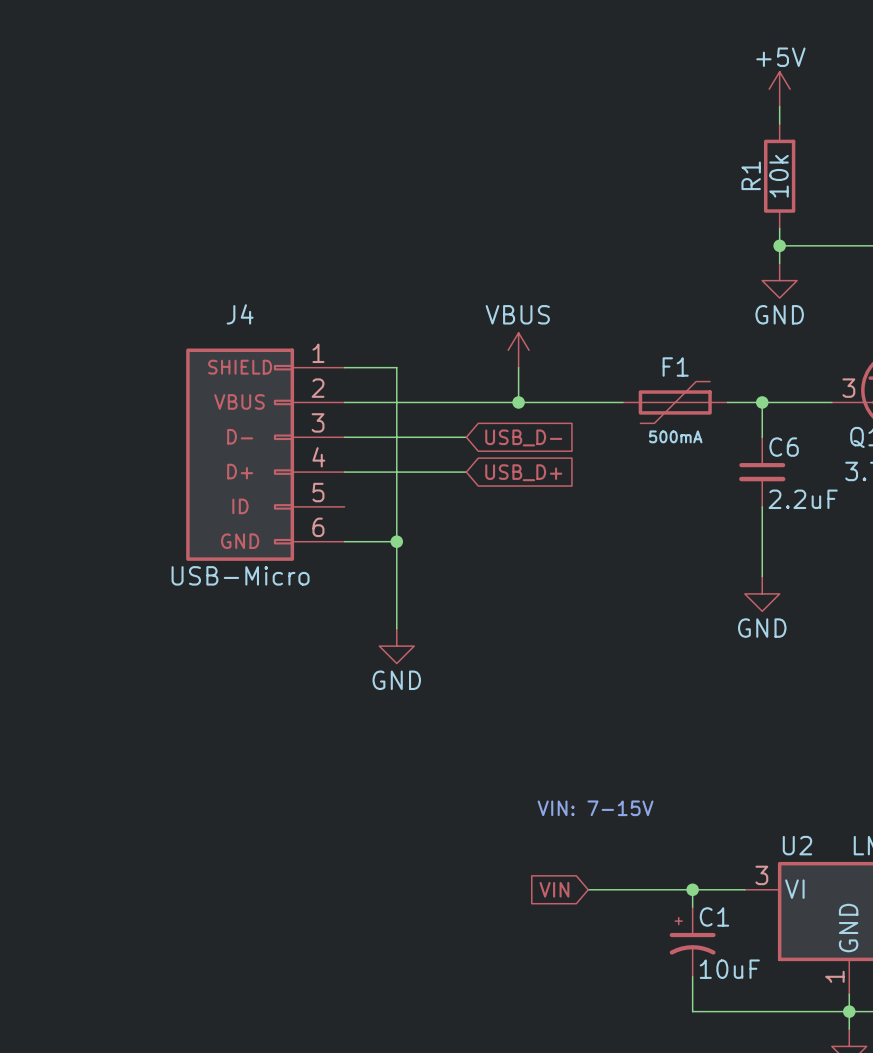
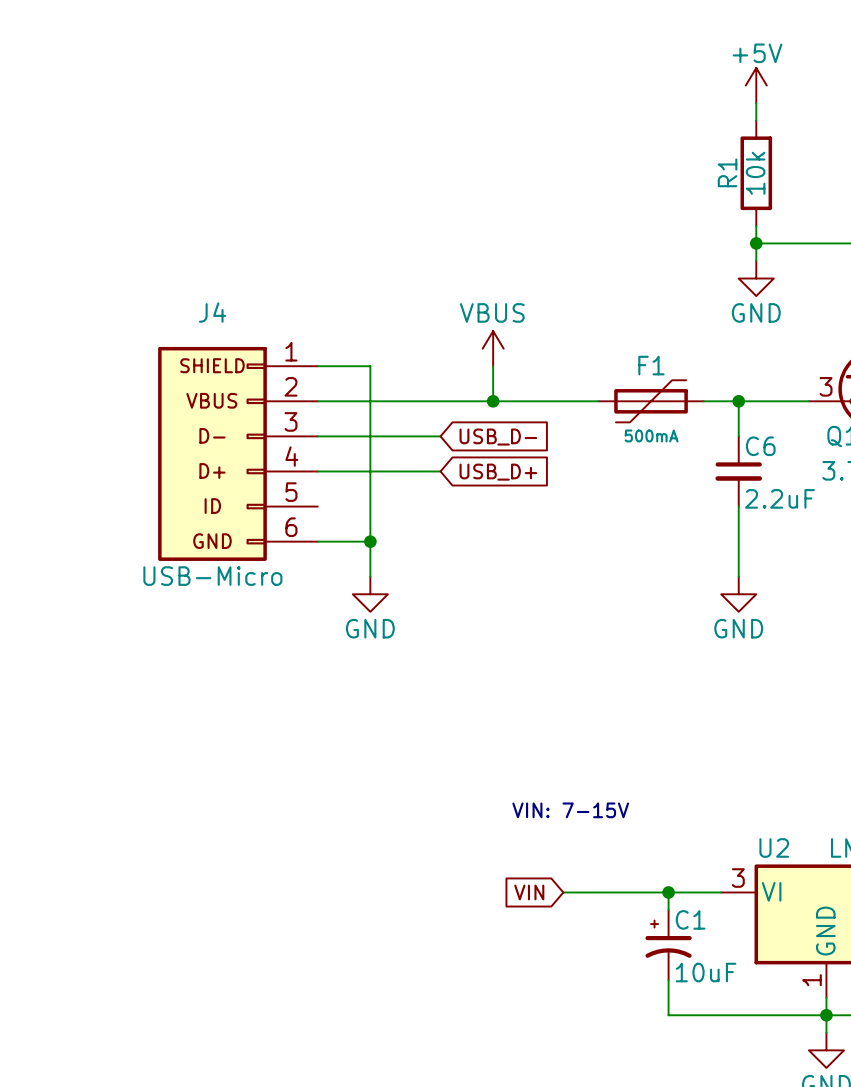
wire: (396, 576) (396, 628) -> none
power symbol position: GND (396, 646) -> GND (370, 594)

